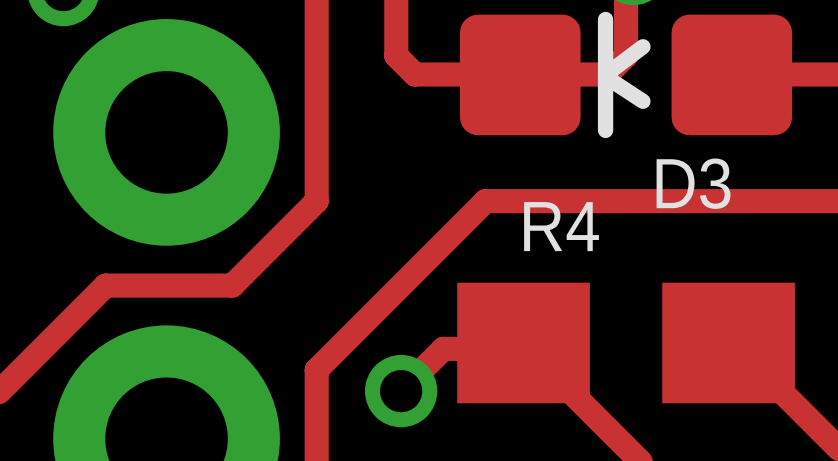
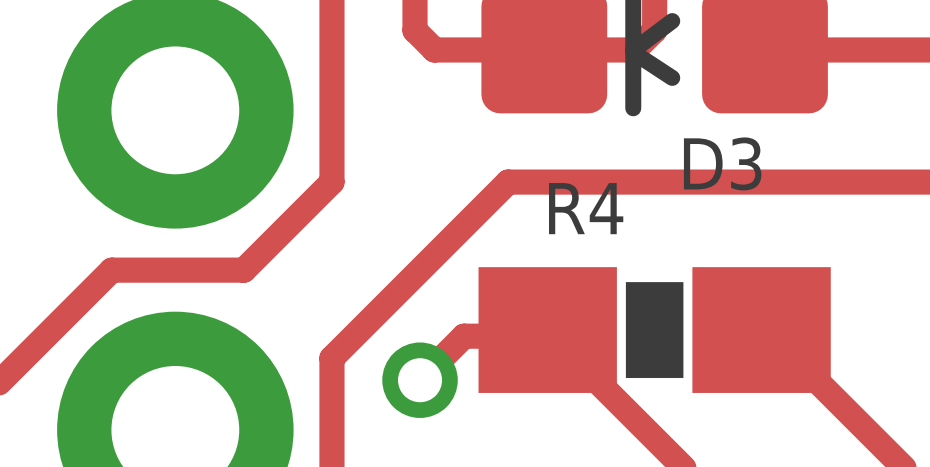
R4 footprint: [457, 282, 795, 404] -> [478, 267, 831, 393]

